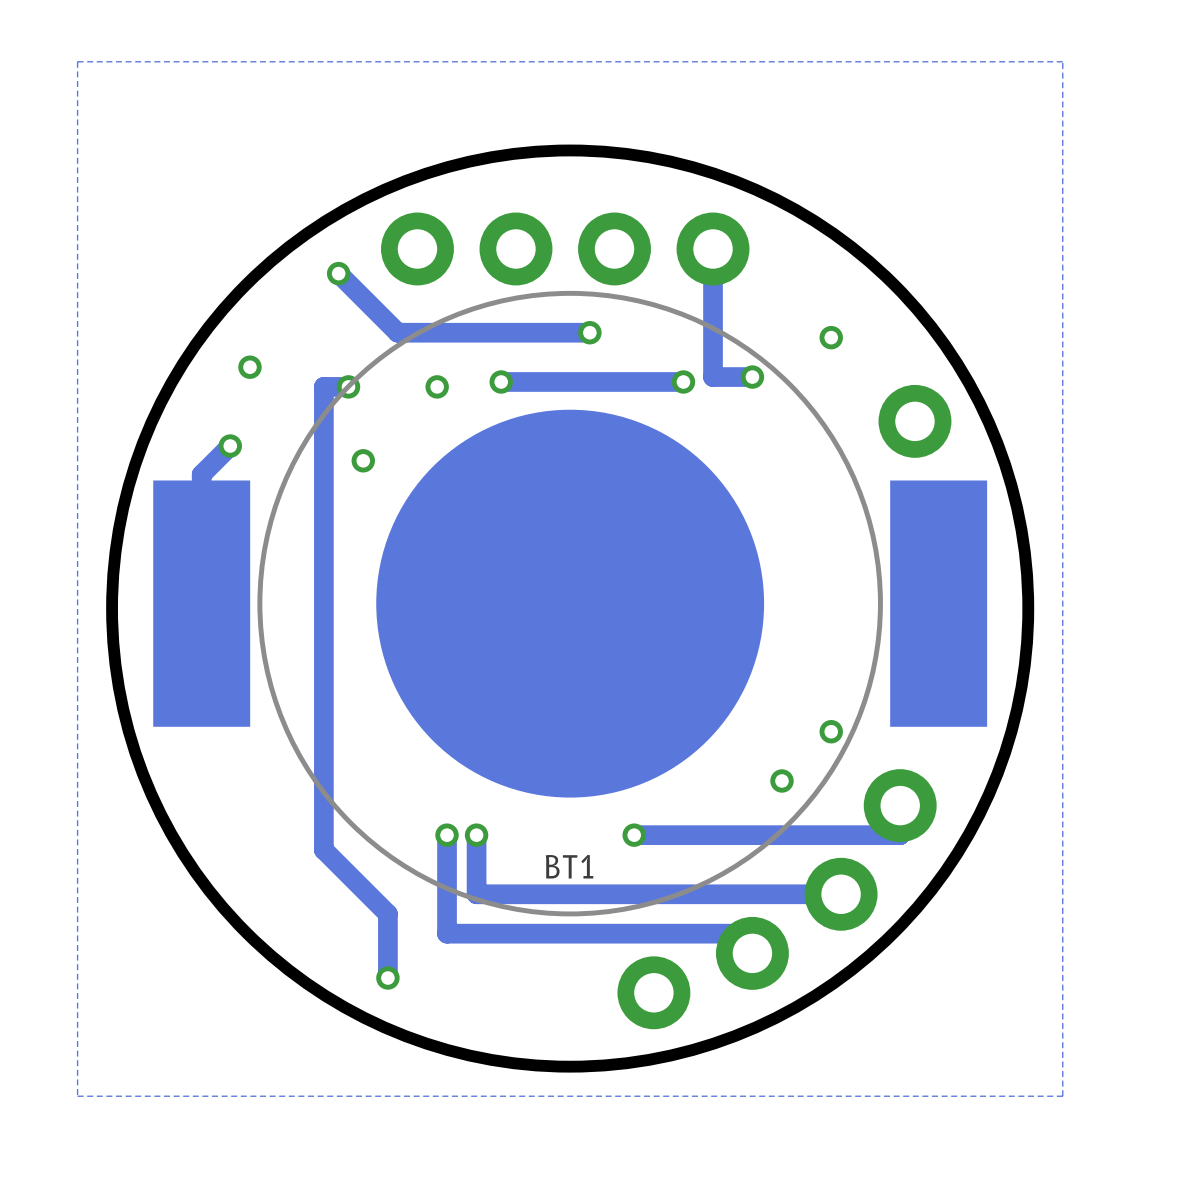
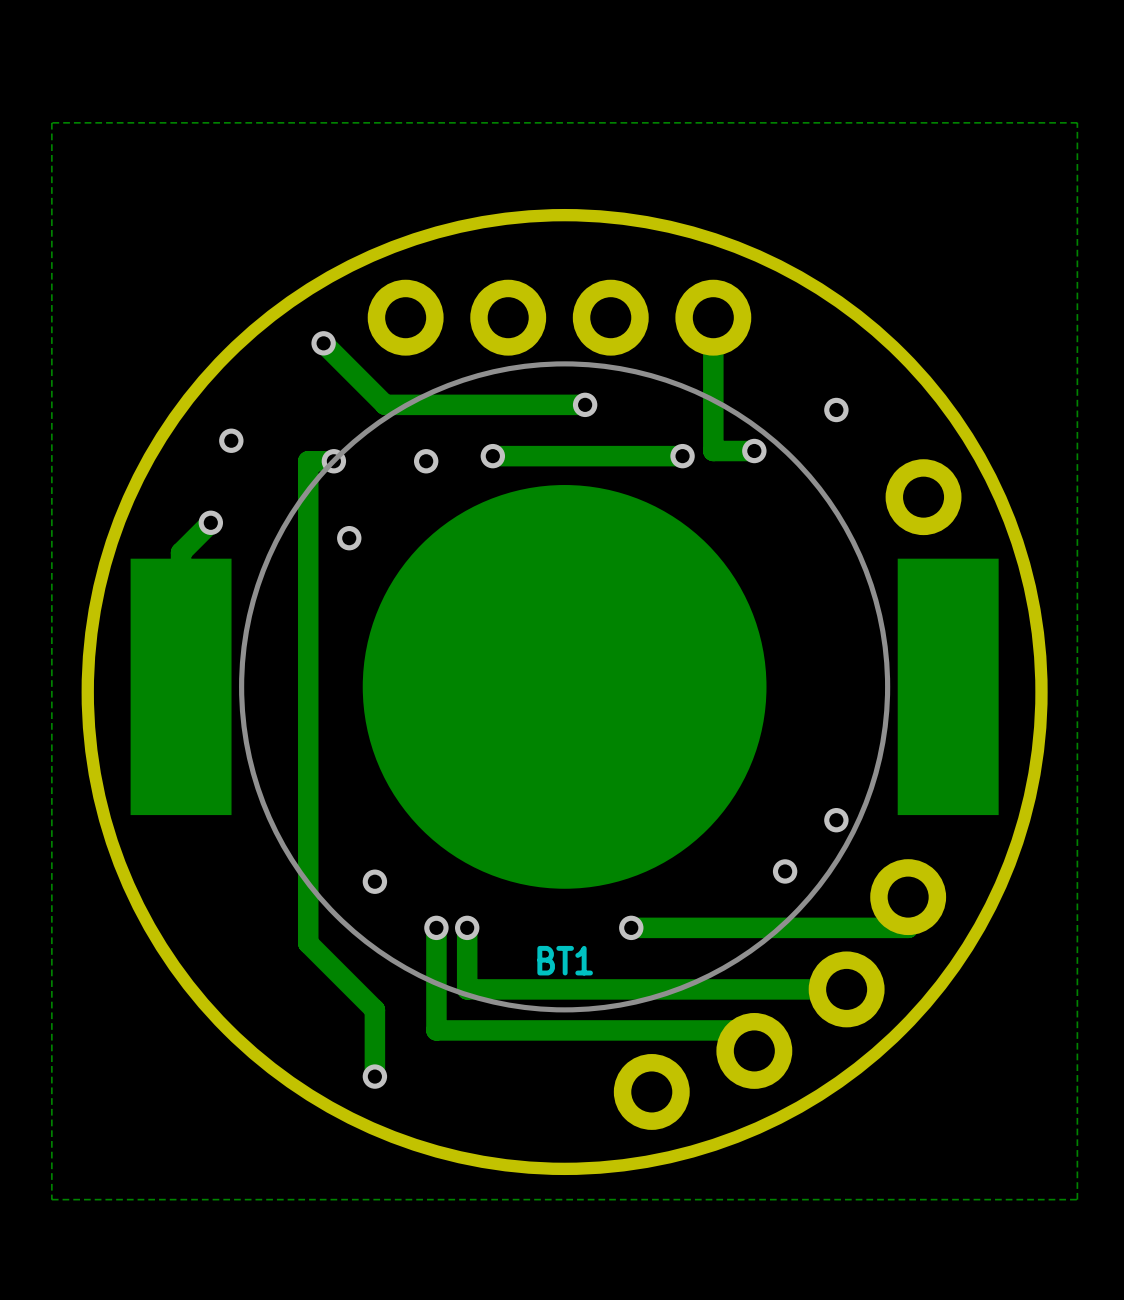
via: none -> (374, 881)

